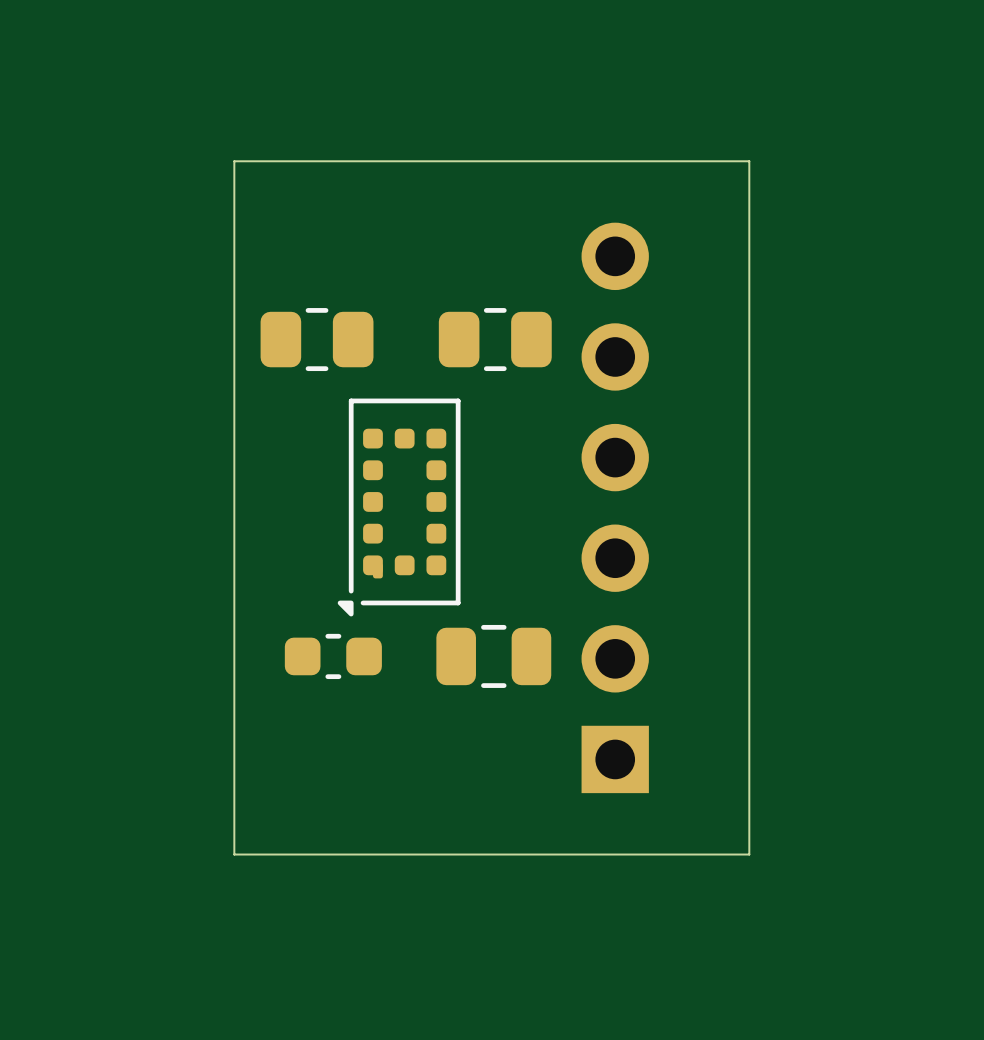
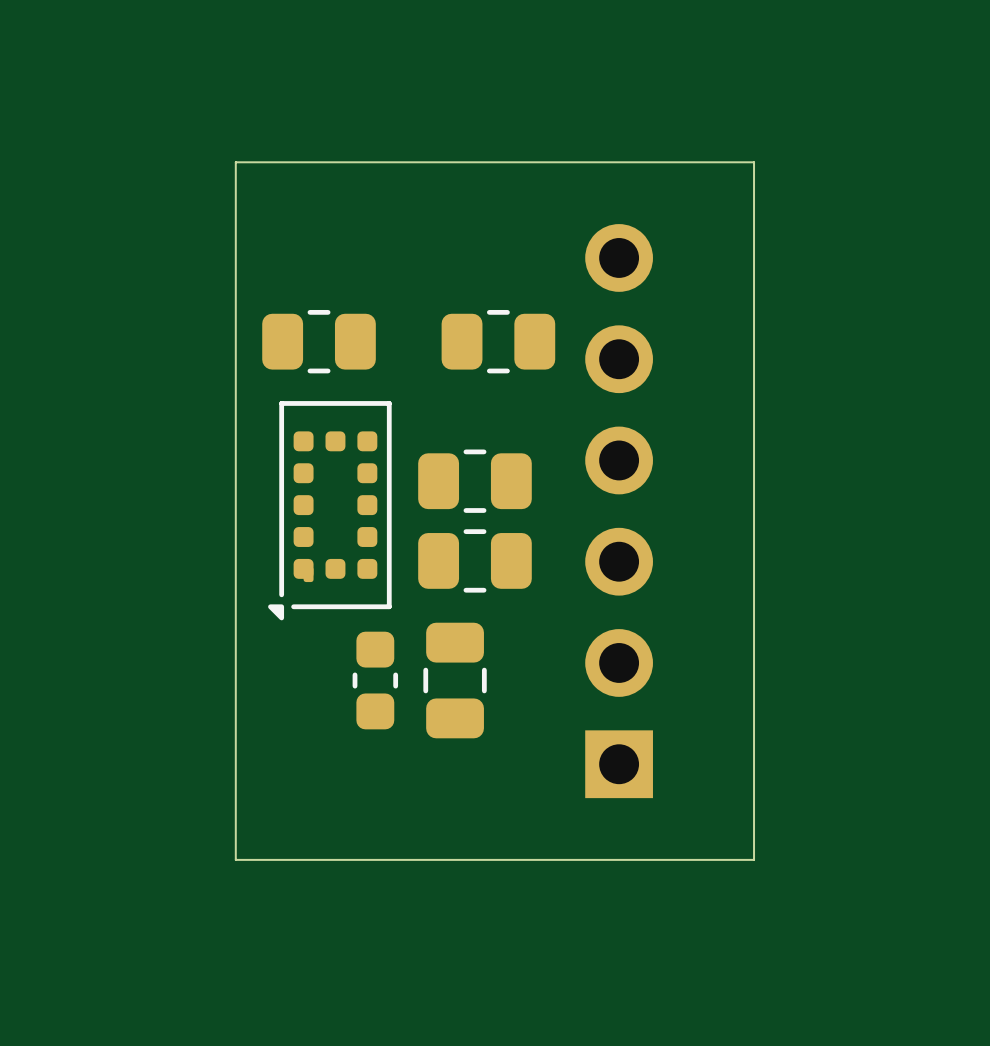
part: none -> (474, 481)
part position: (399, 507) -> (329, 510)
part: none -> (474, 560)
part rotation: 0° (333, 656) -> 90° clockwise (375, 680)
part rotation: 0° (493, 656) -> 90° clockwise (455, 680)

